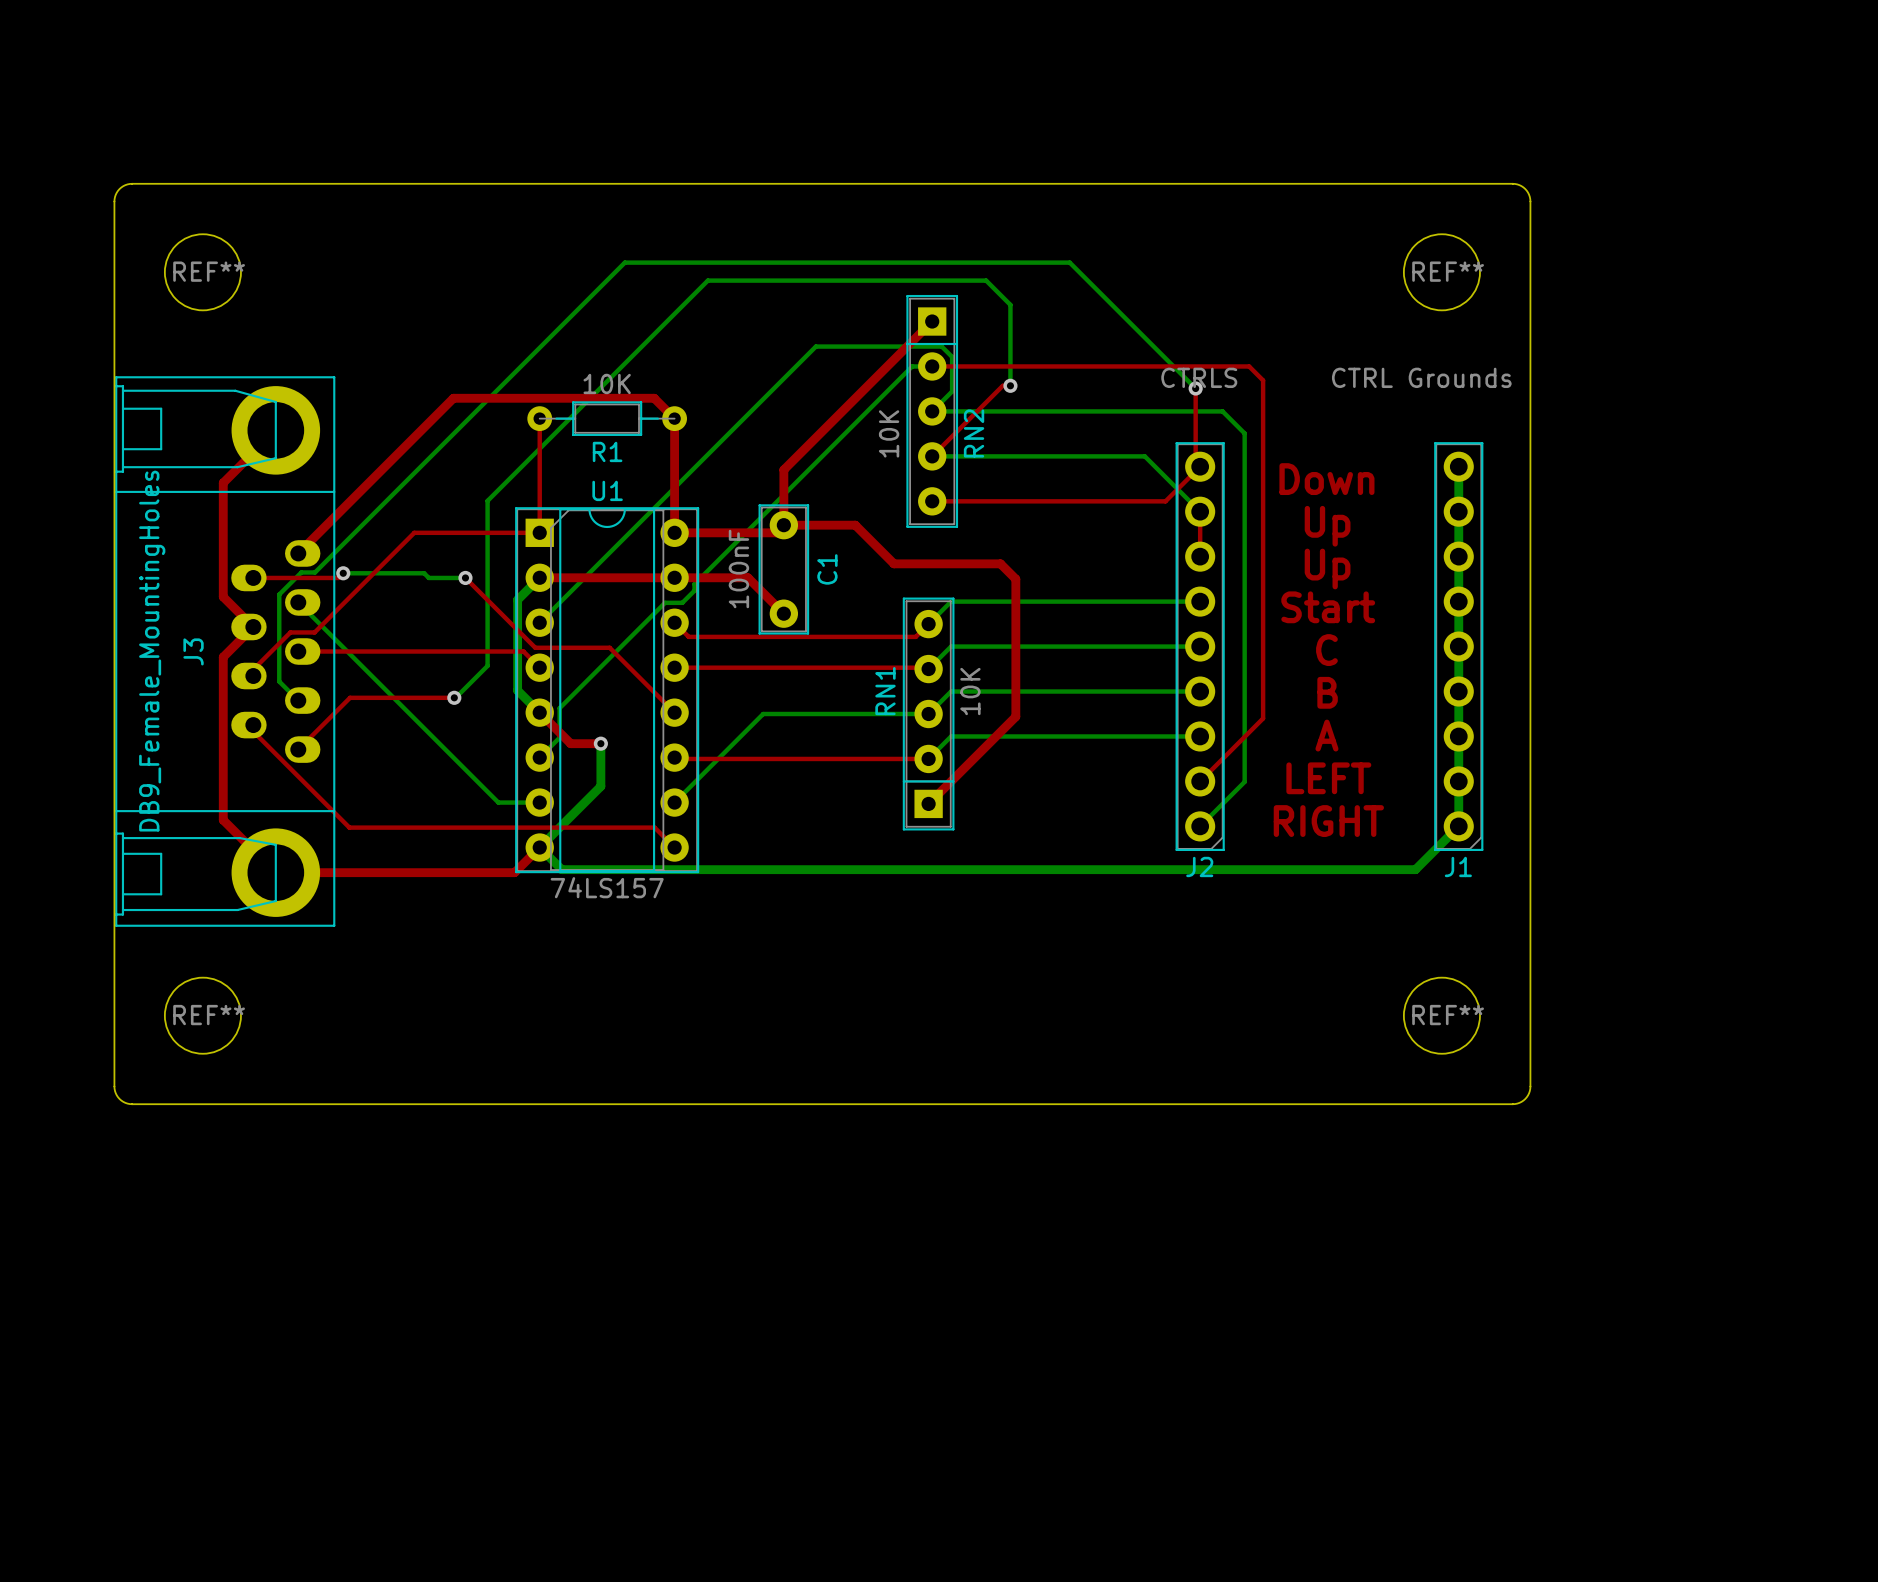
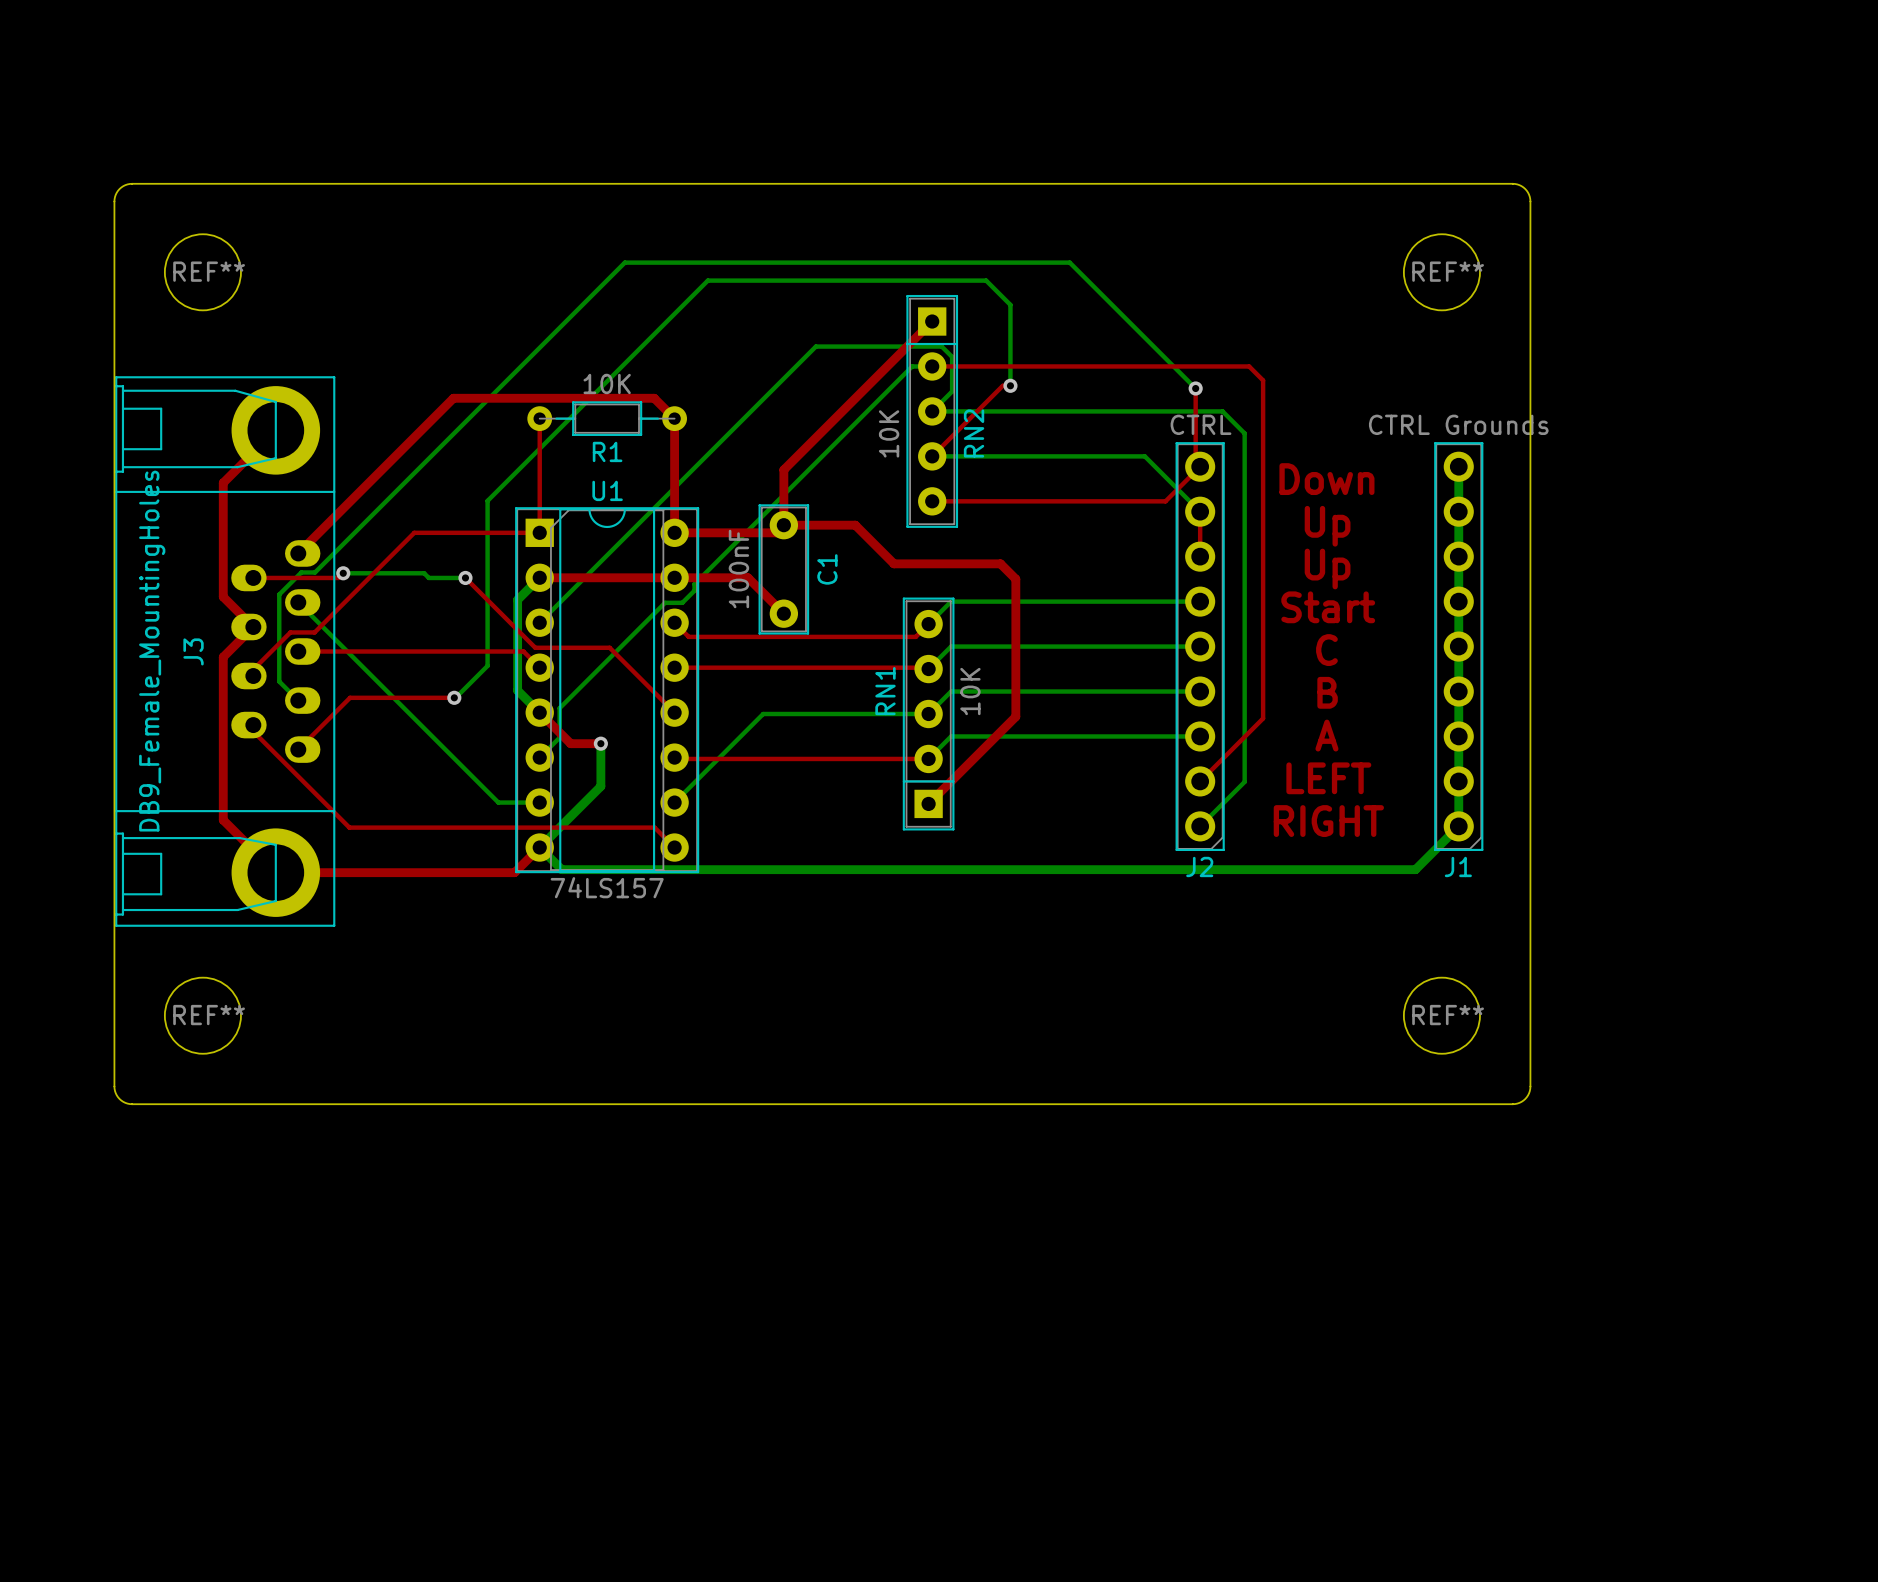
J2 value: CTRLS (1199, 377) -> CTRL (1201, 424)
J1 value position: CTRL Grounds (1421, 377) -> CTRL Grounds (1458, 424)

